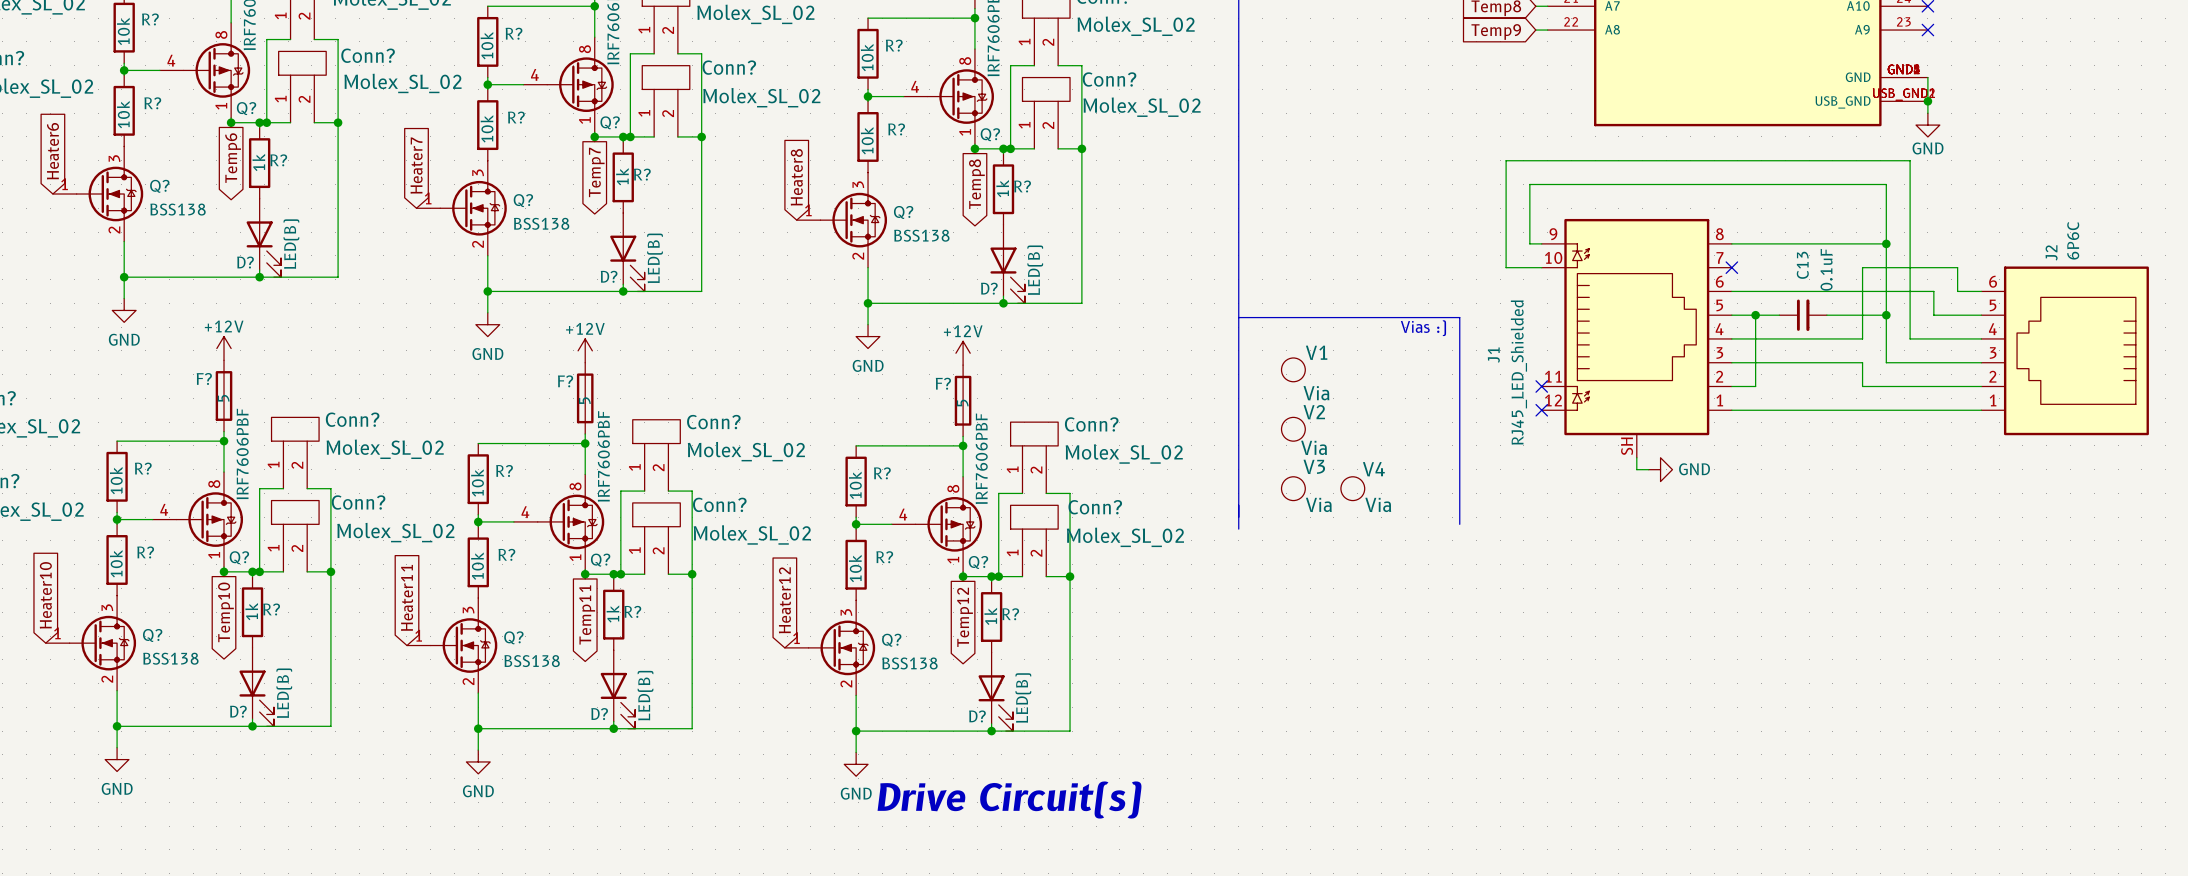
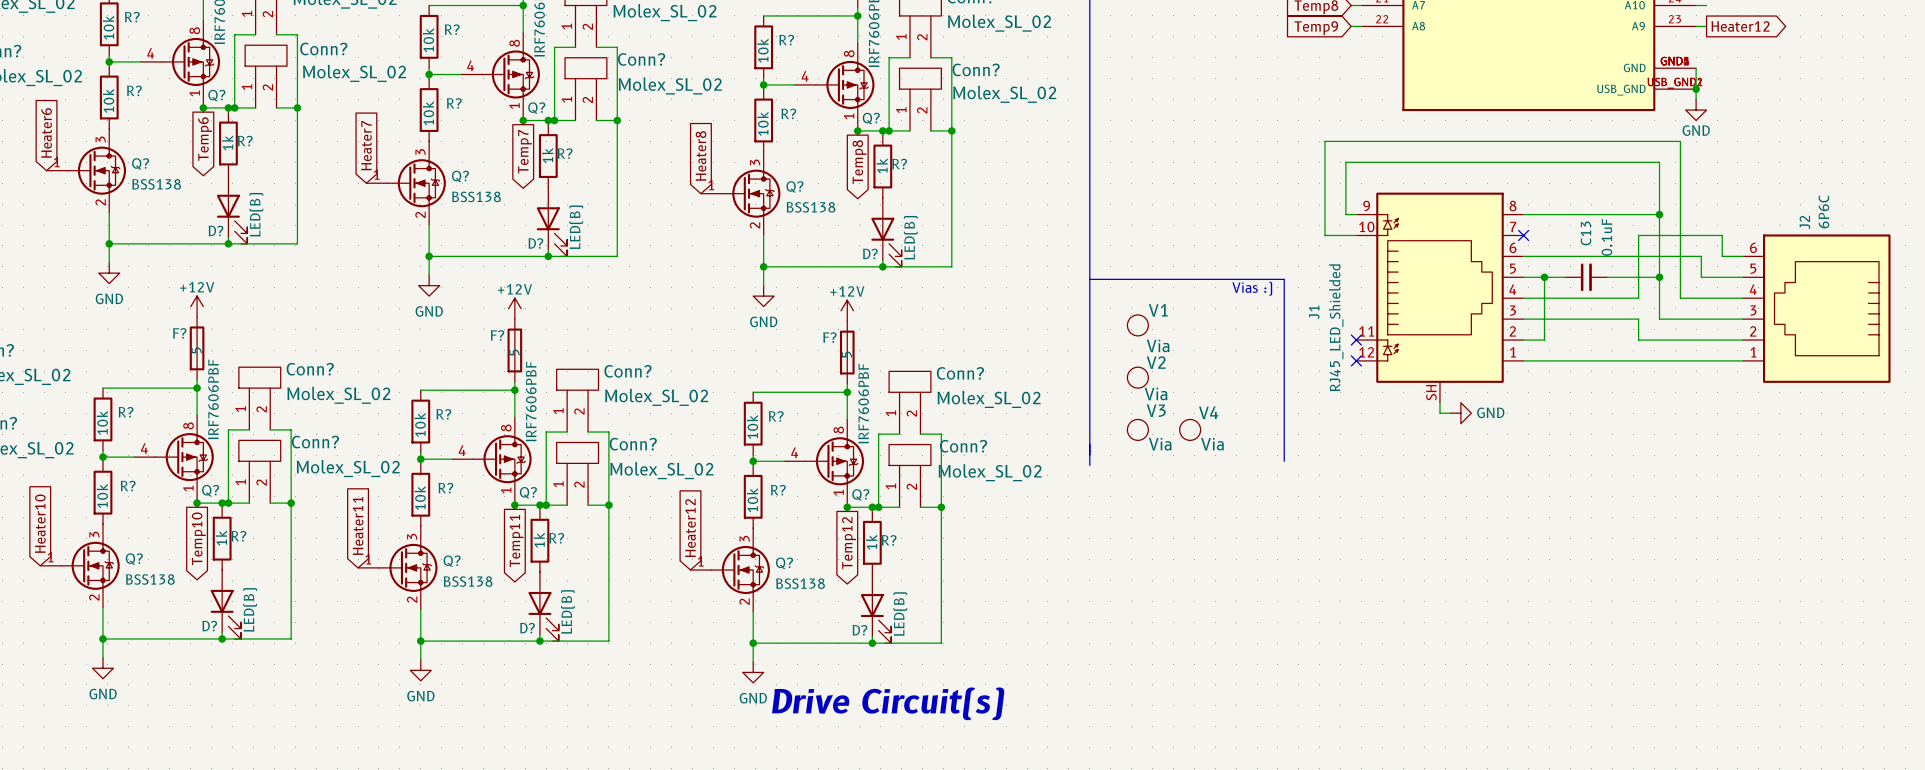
wire: none -> (1696, 5) (1706, 5)
no-connect mark: (1927, 6) -> none
wire: none -> (1696, 26) (1706, 26)
no-connect mark: (1927, 30) -> none
global label: none -> Heater12 (1740, 26)

